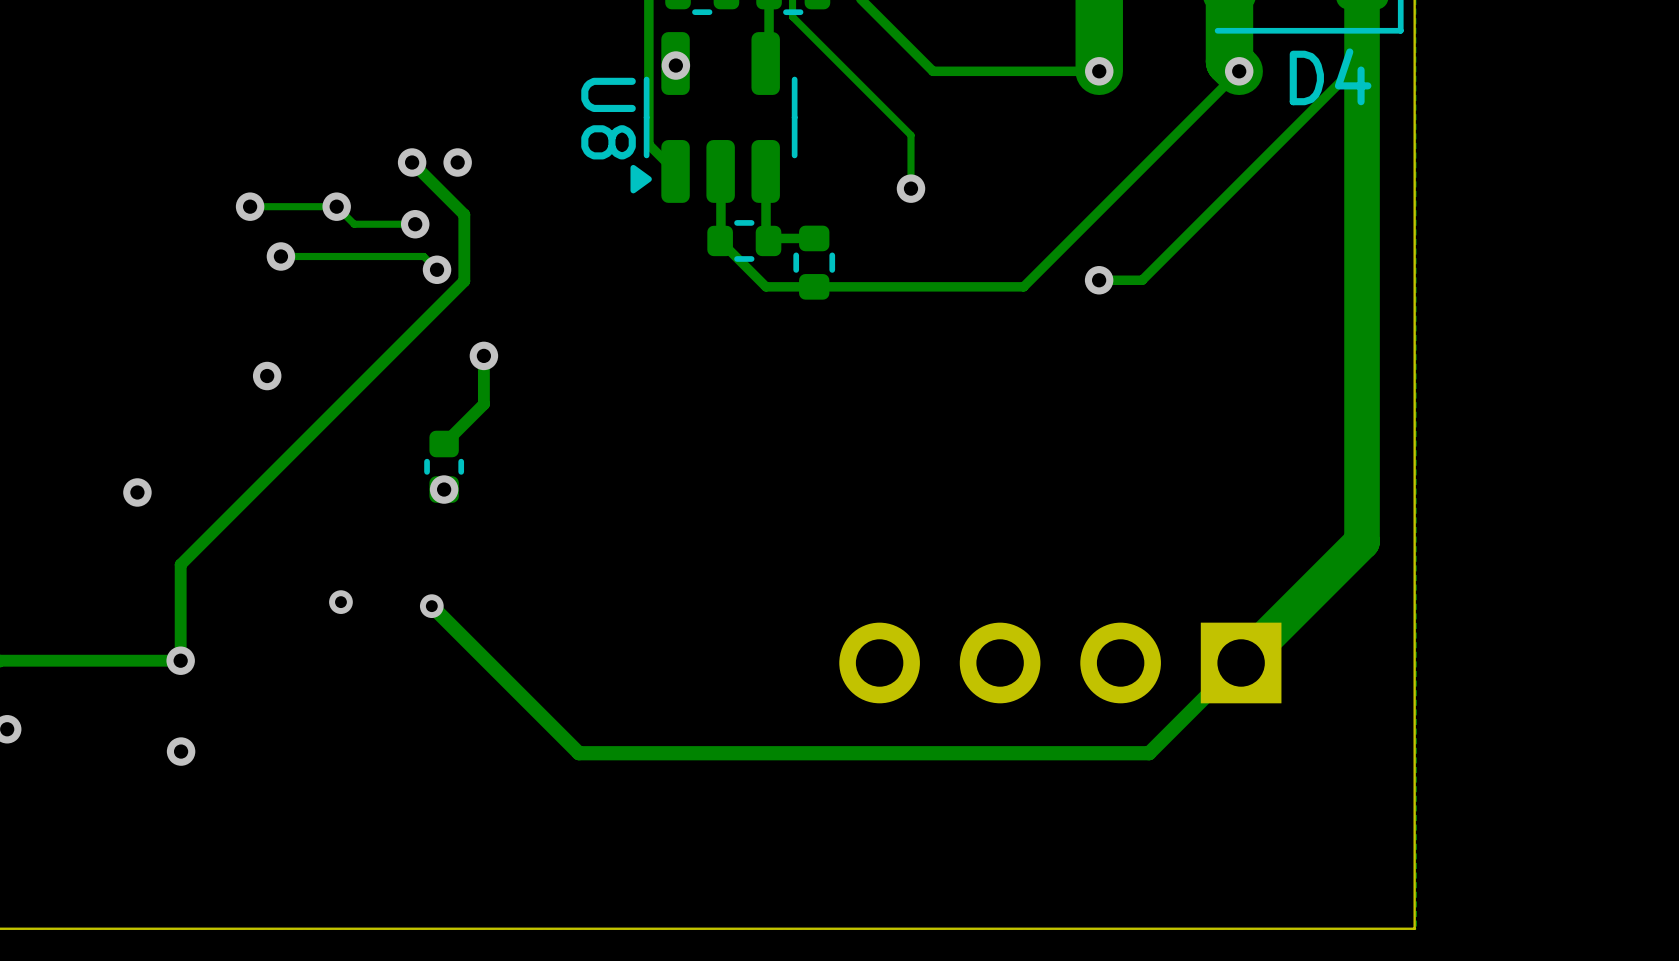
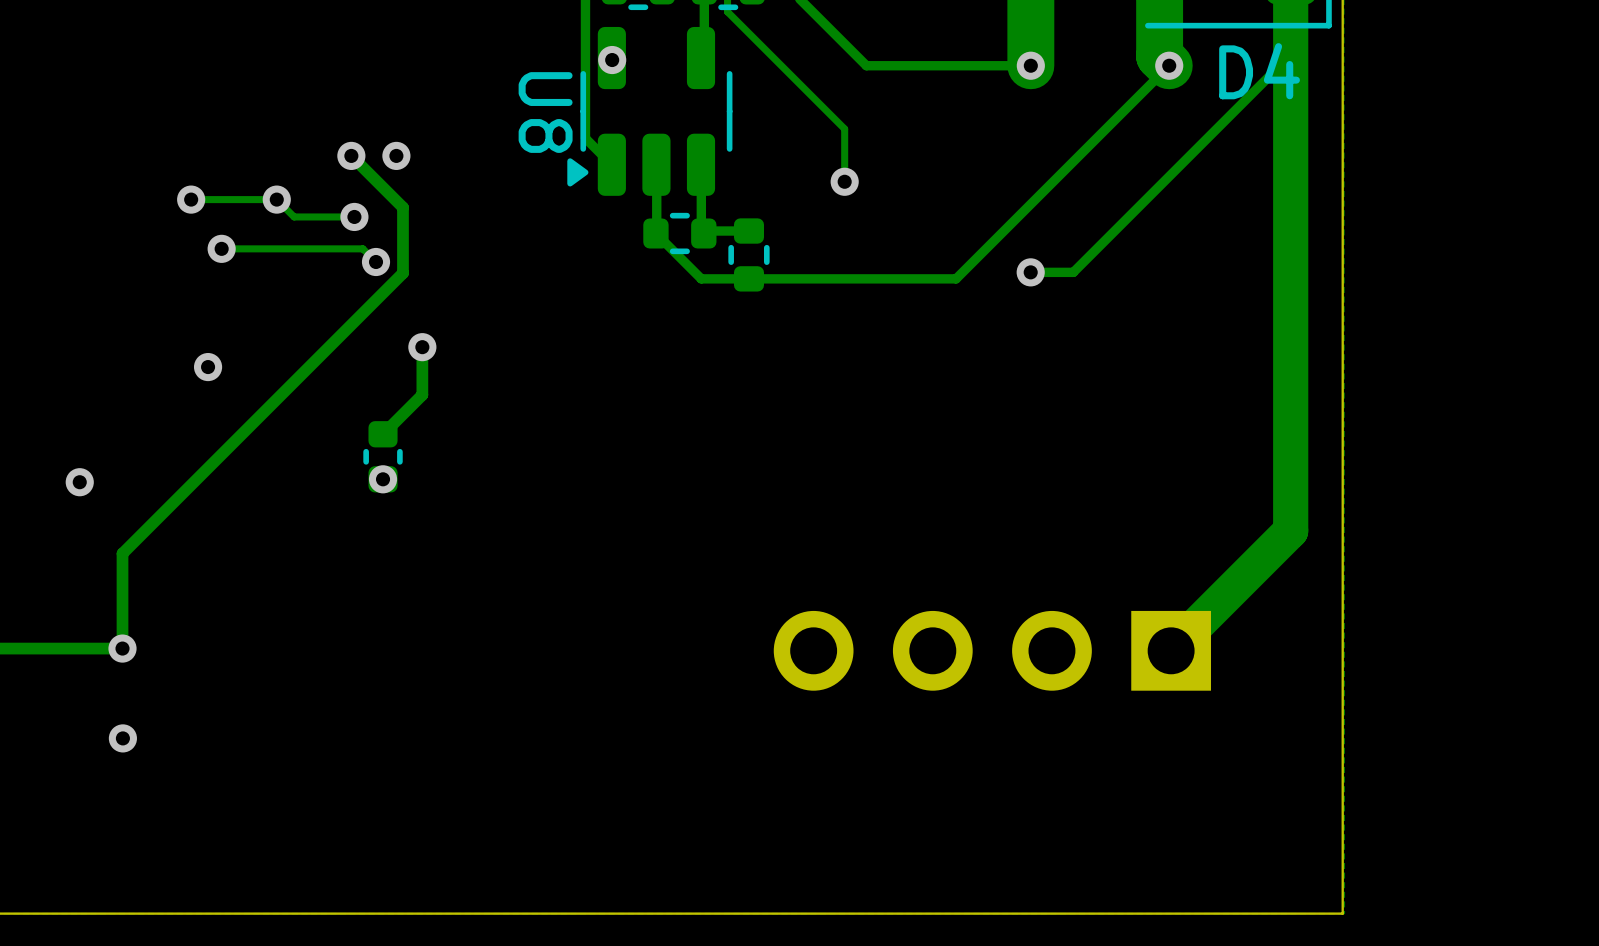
via: (340, 602) -> none
track: (431, 606) (578, 753) (1149, 753) (1241, 662) -> none
via: (431, 606) -> none

